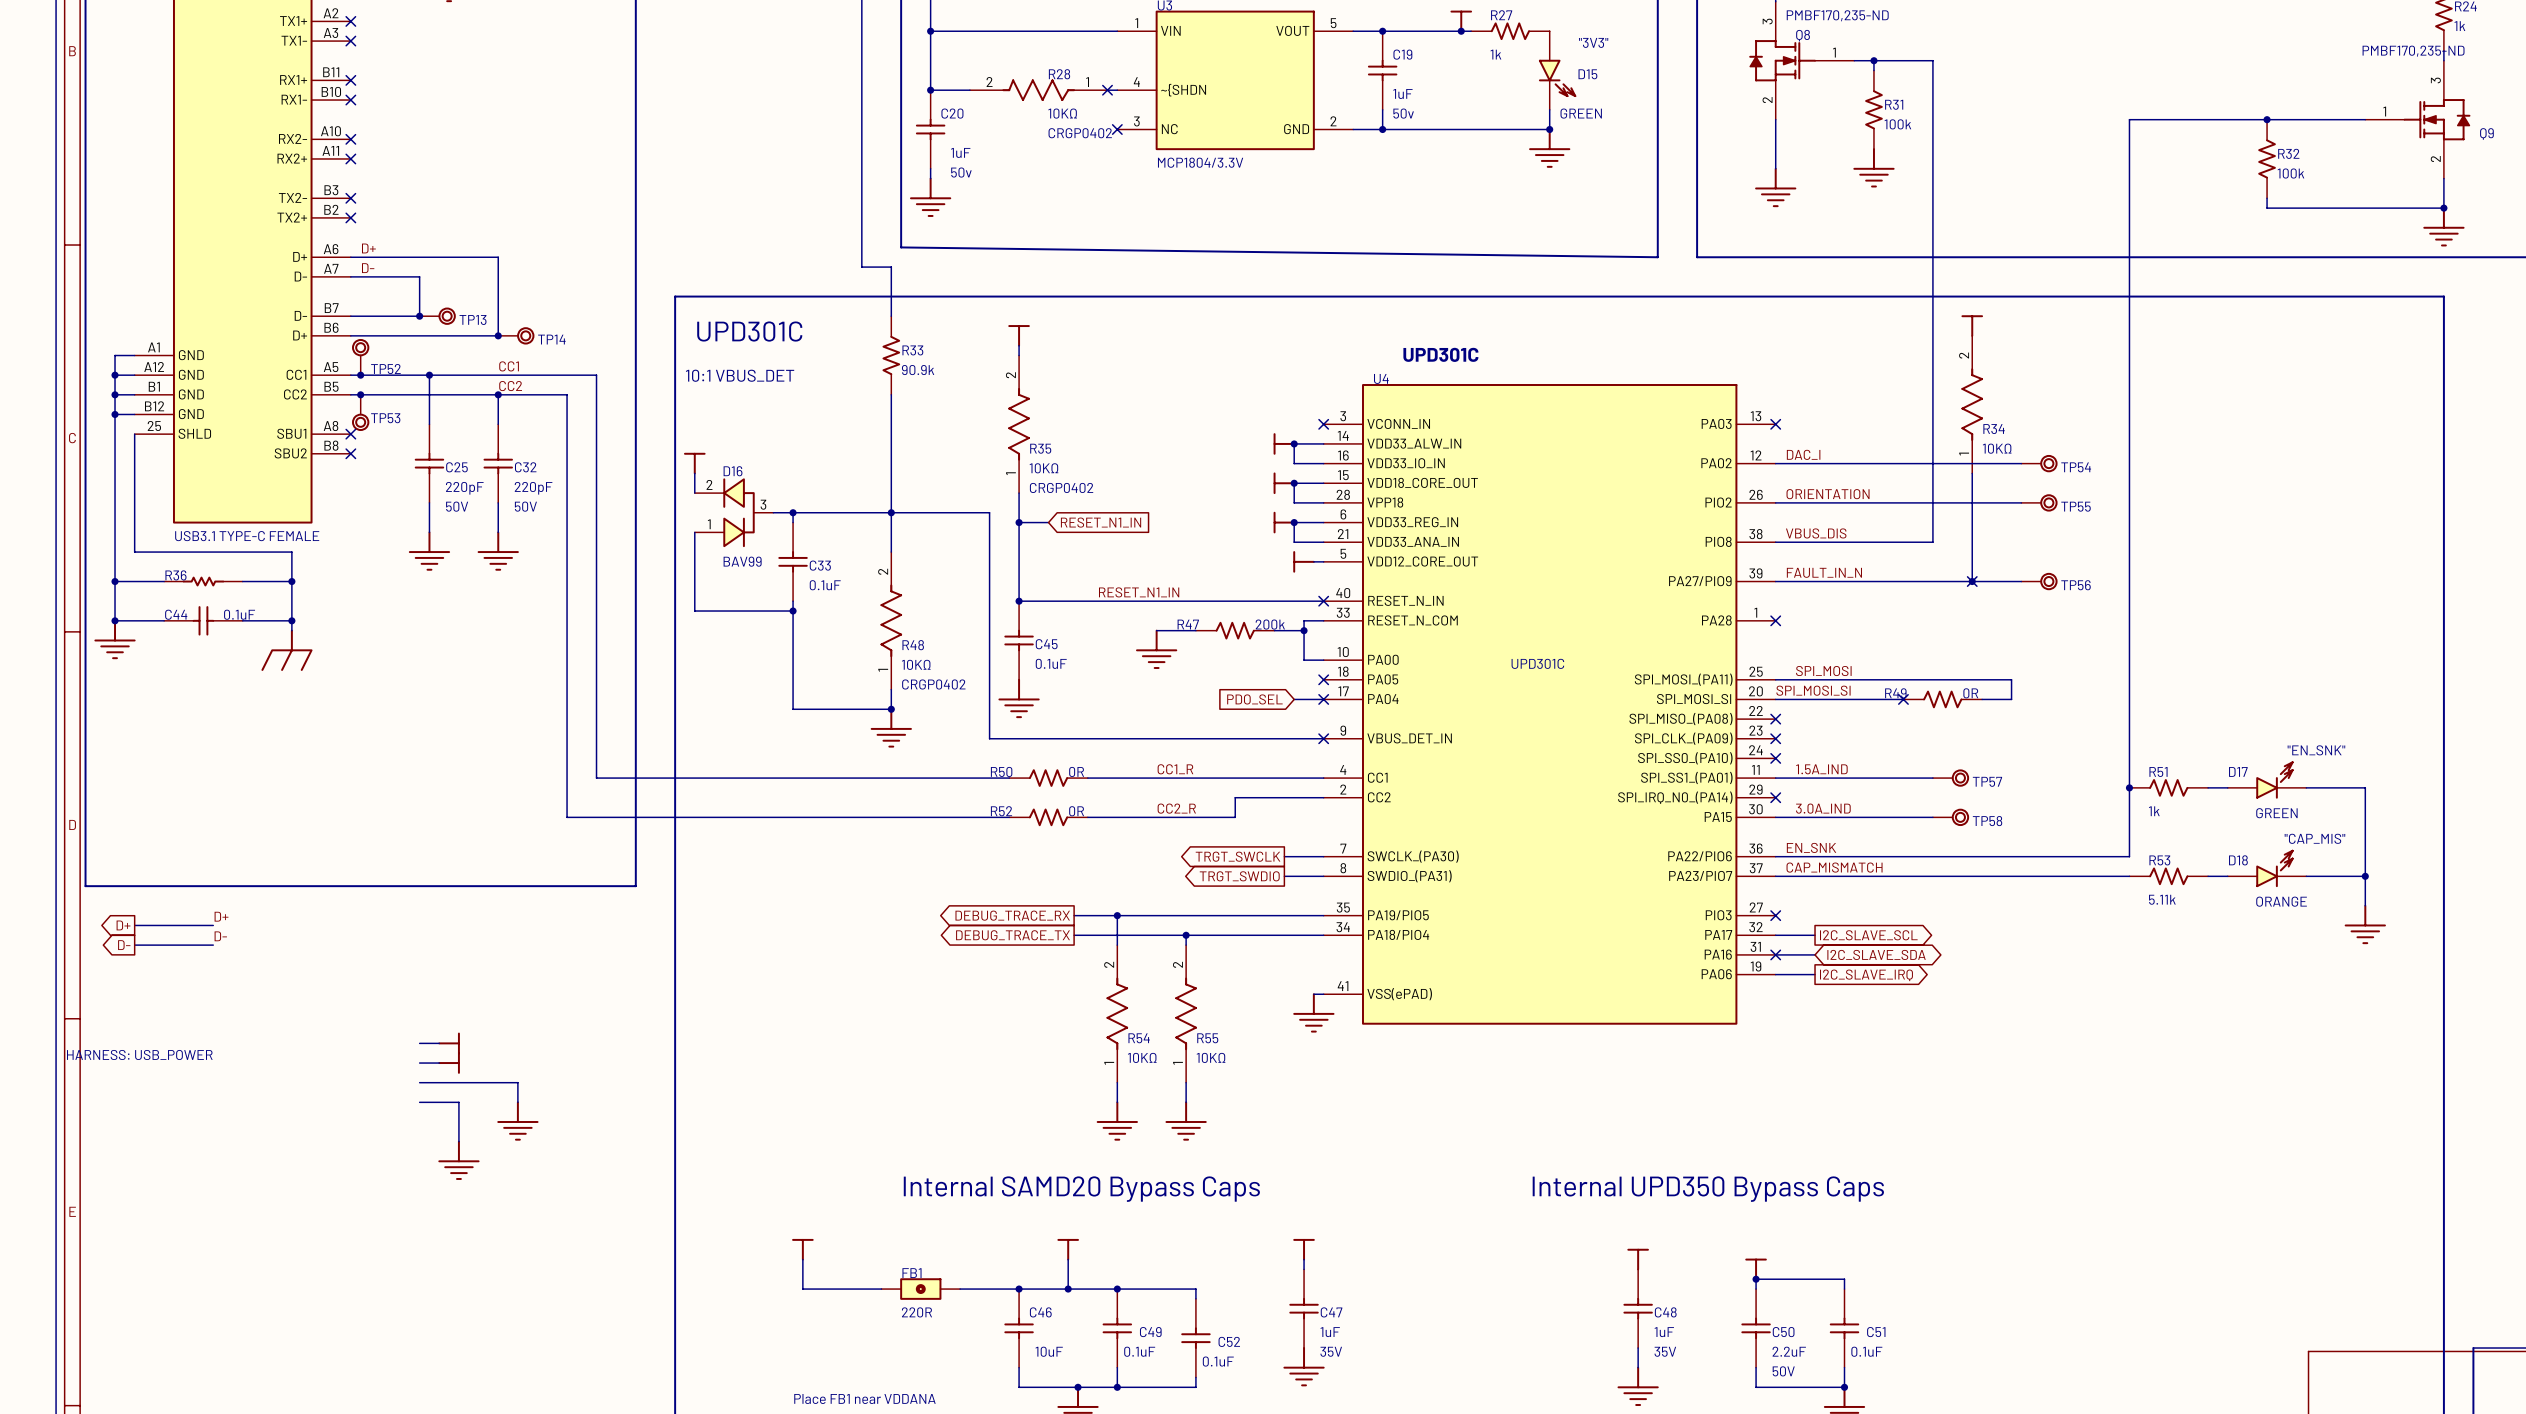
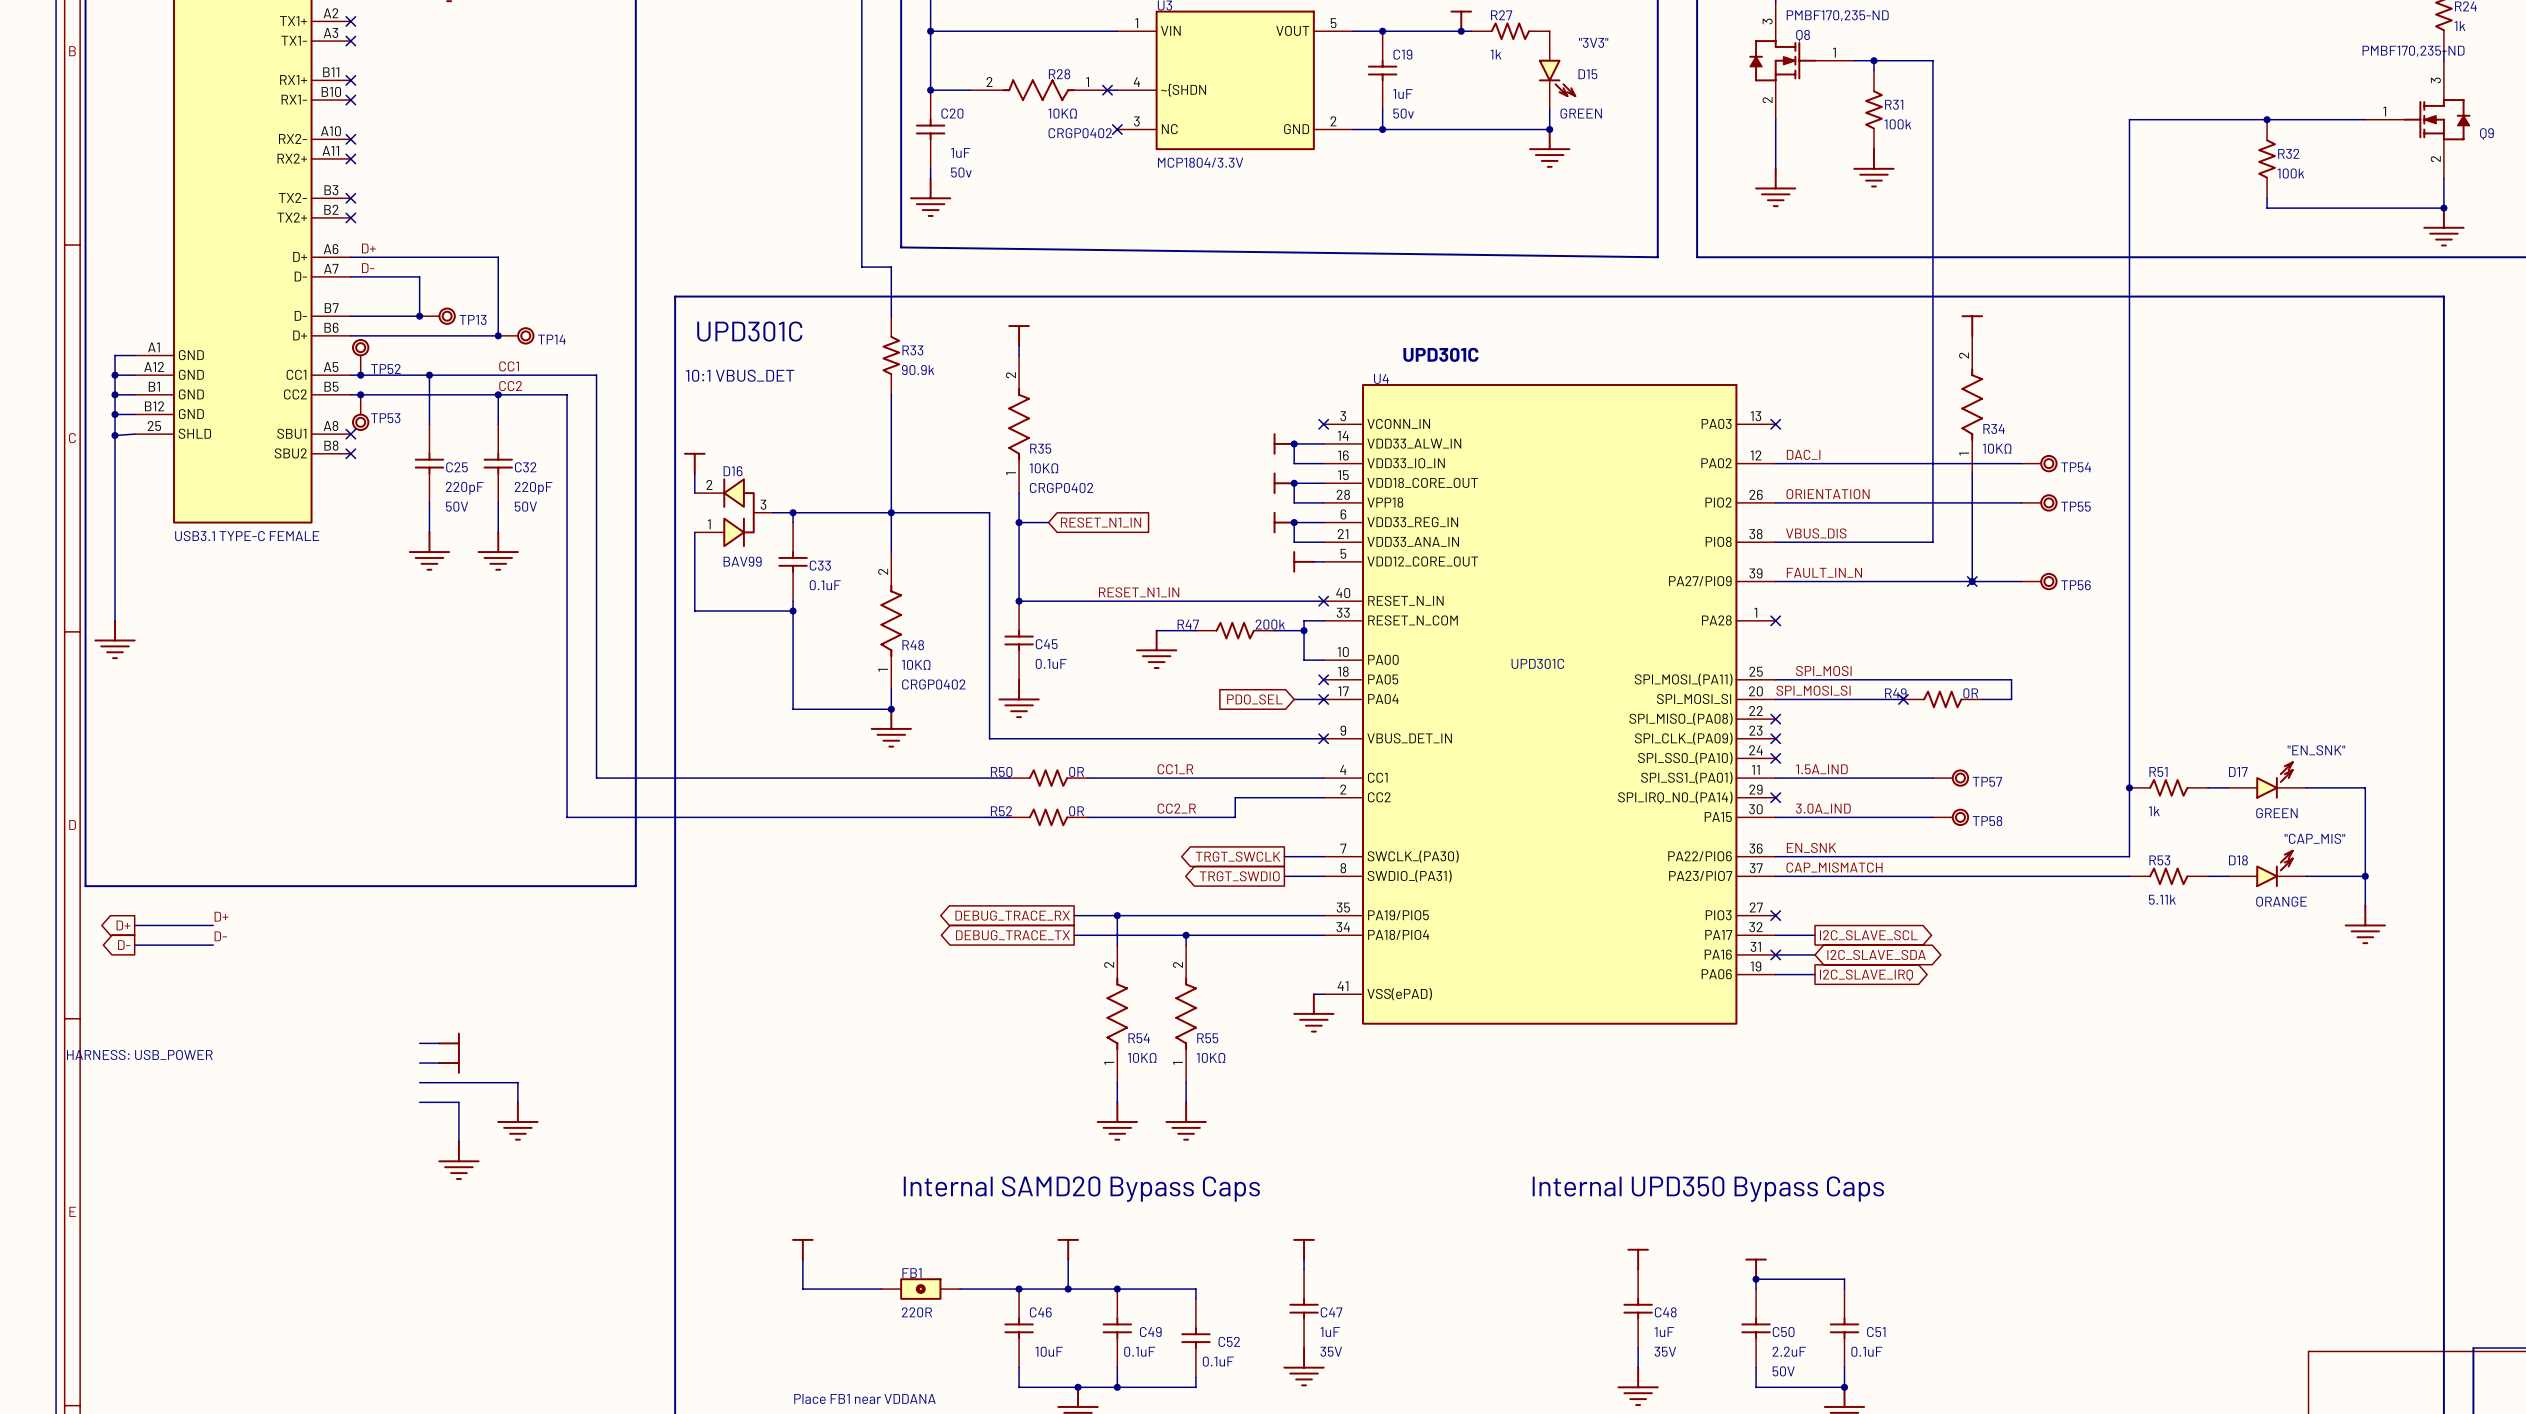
wire: (134, 434) (134, 552) (291, 552) (291, 630) -> (134, 434) (115, 435)
junction: none -> (115, 435)
wire: (115, 581) (164, 581) -> none
junction: (115, 581) -> none
R36: (203, 581) -> none
wire: (242, 581) (291, 581) -> none
junction: (291, 581) -> none
wire: (115, 620) (164, 620) -> none
junction: (115, 620) -> none
C44: (203, 620) -> none
wire: (242, 620) (291, 620) -> none
junction: (291, 620) -> none
power symbol: (286, 650) -> none

